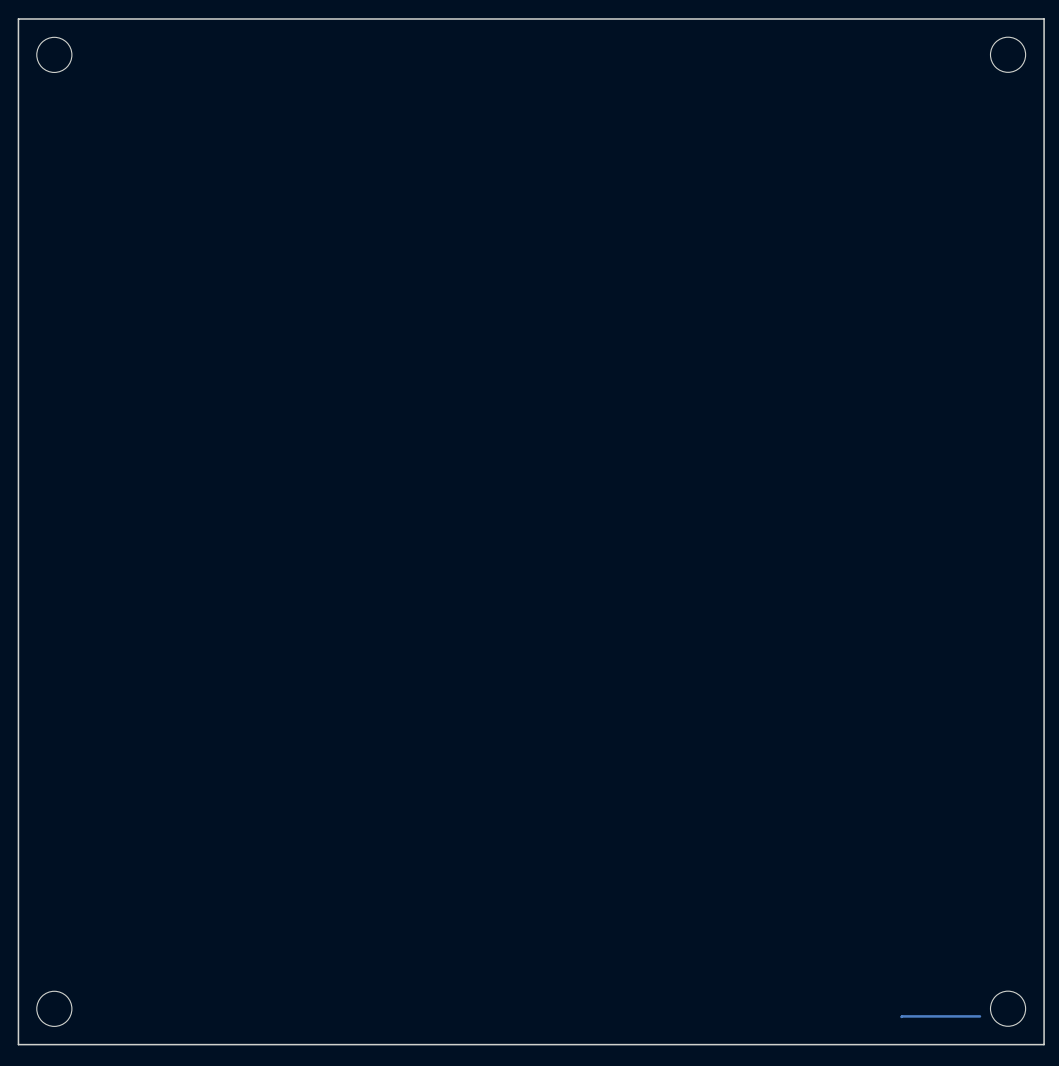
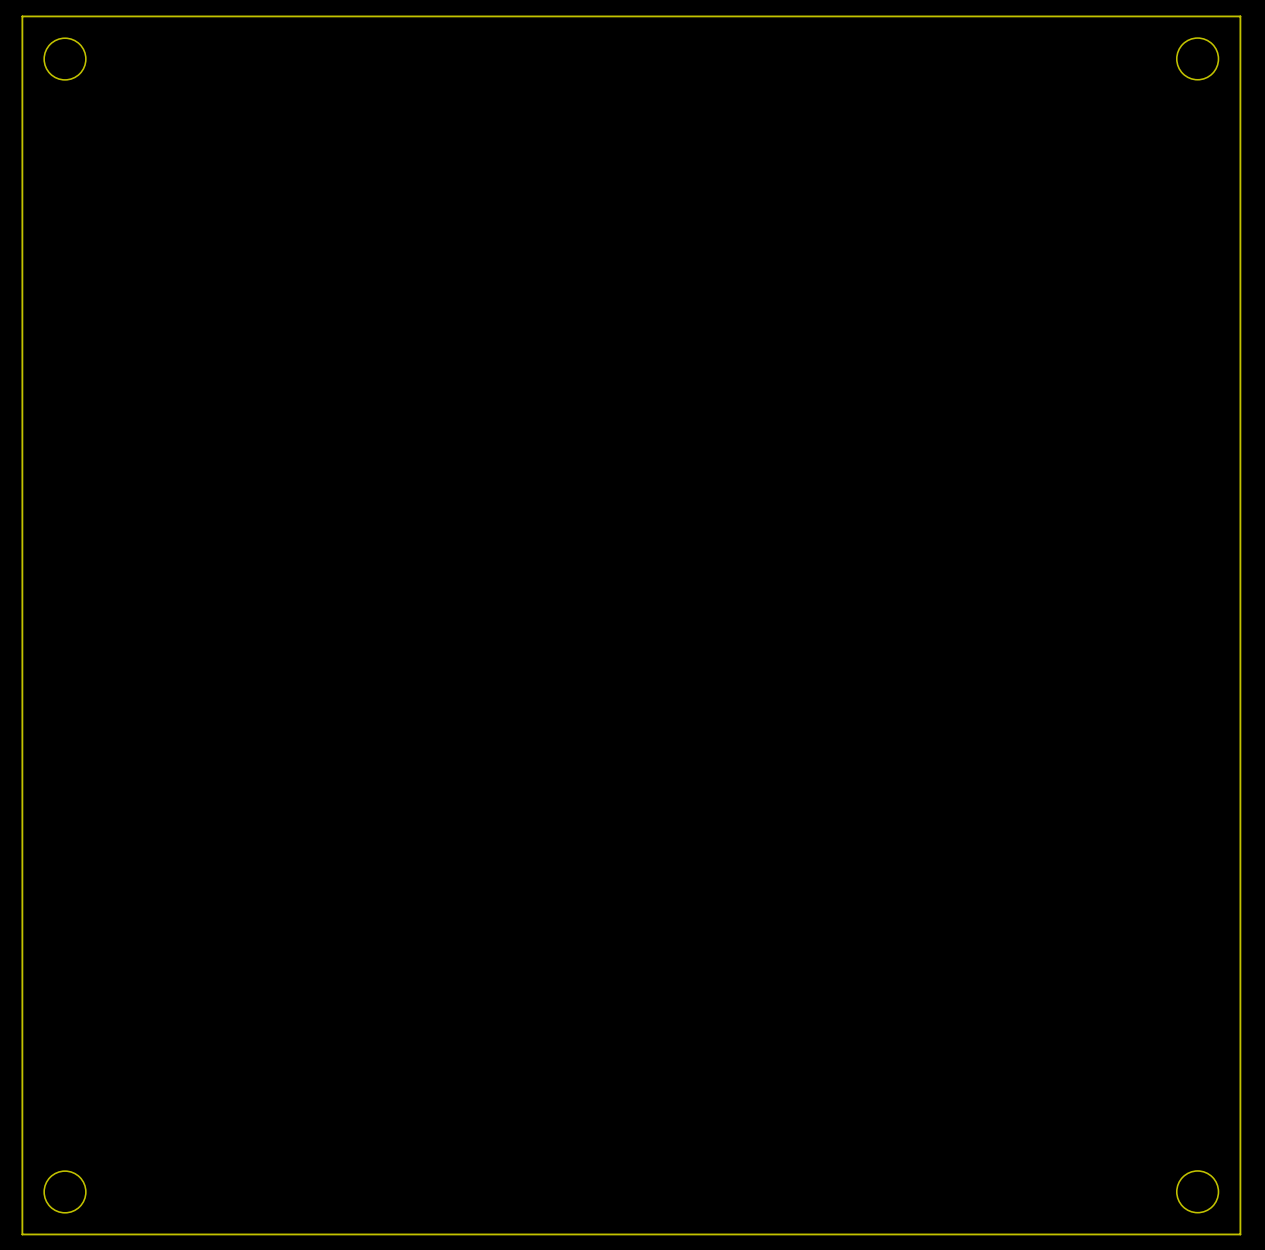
bottom track: (979, 1016) (901, 1016) -> none

